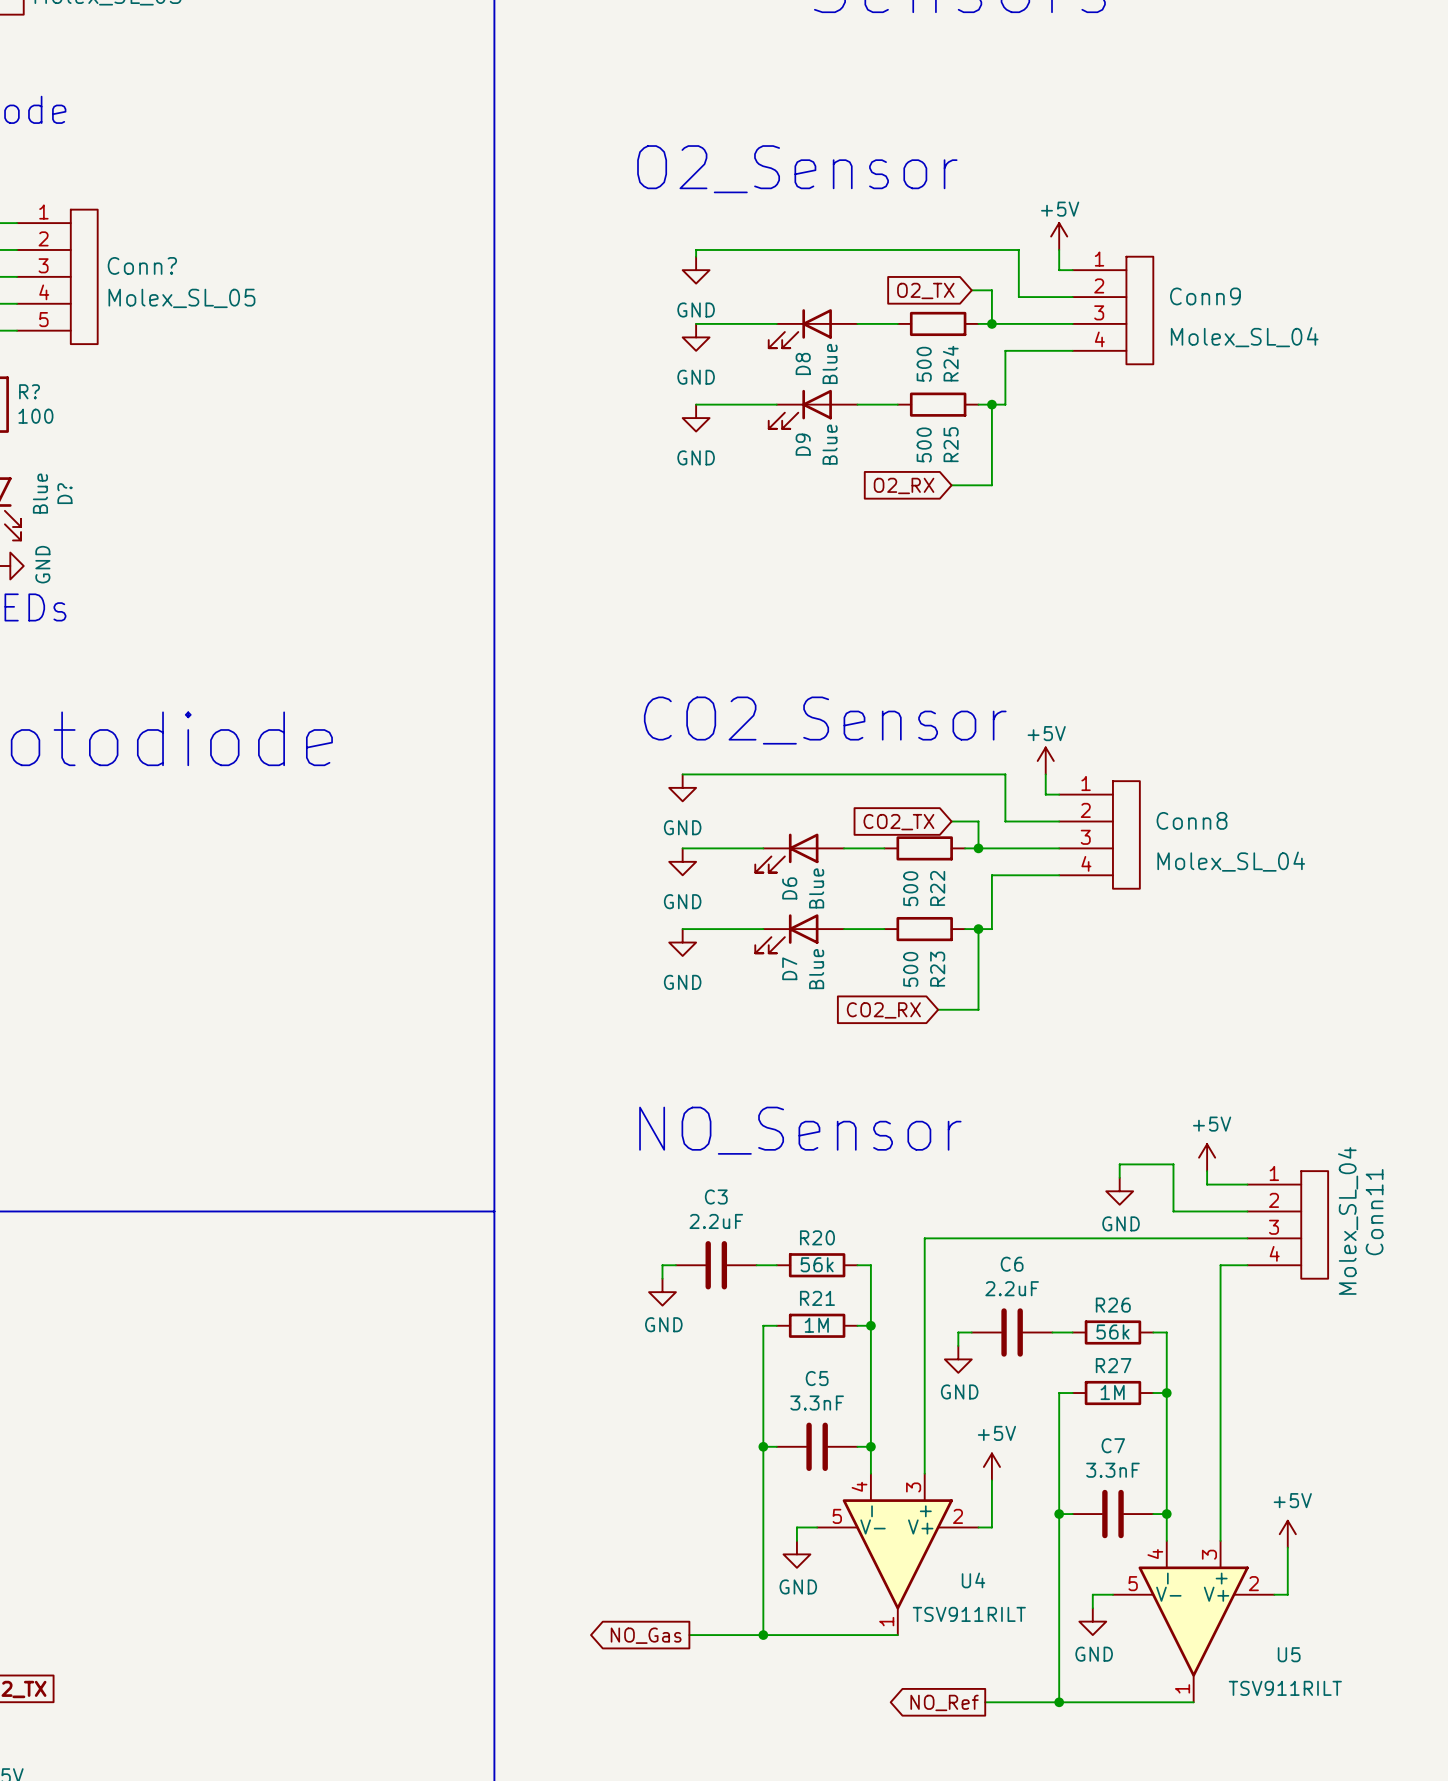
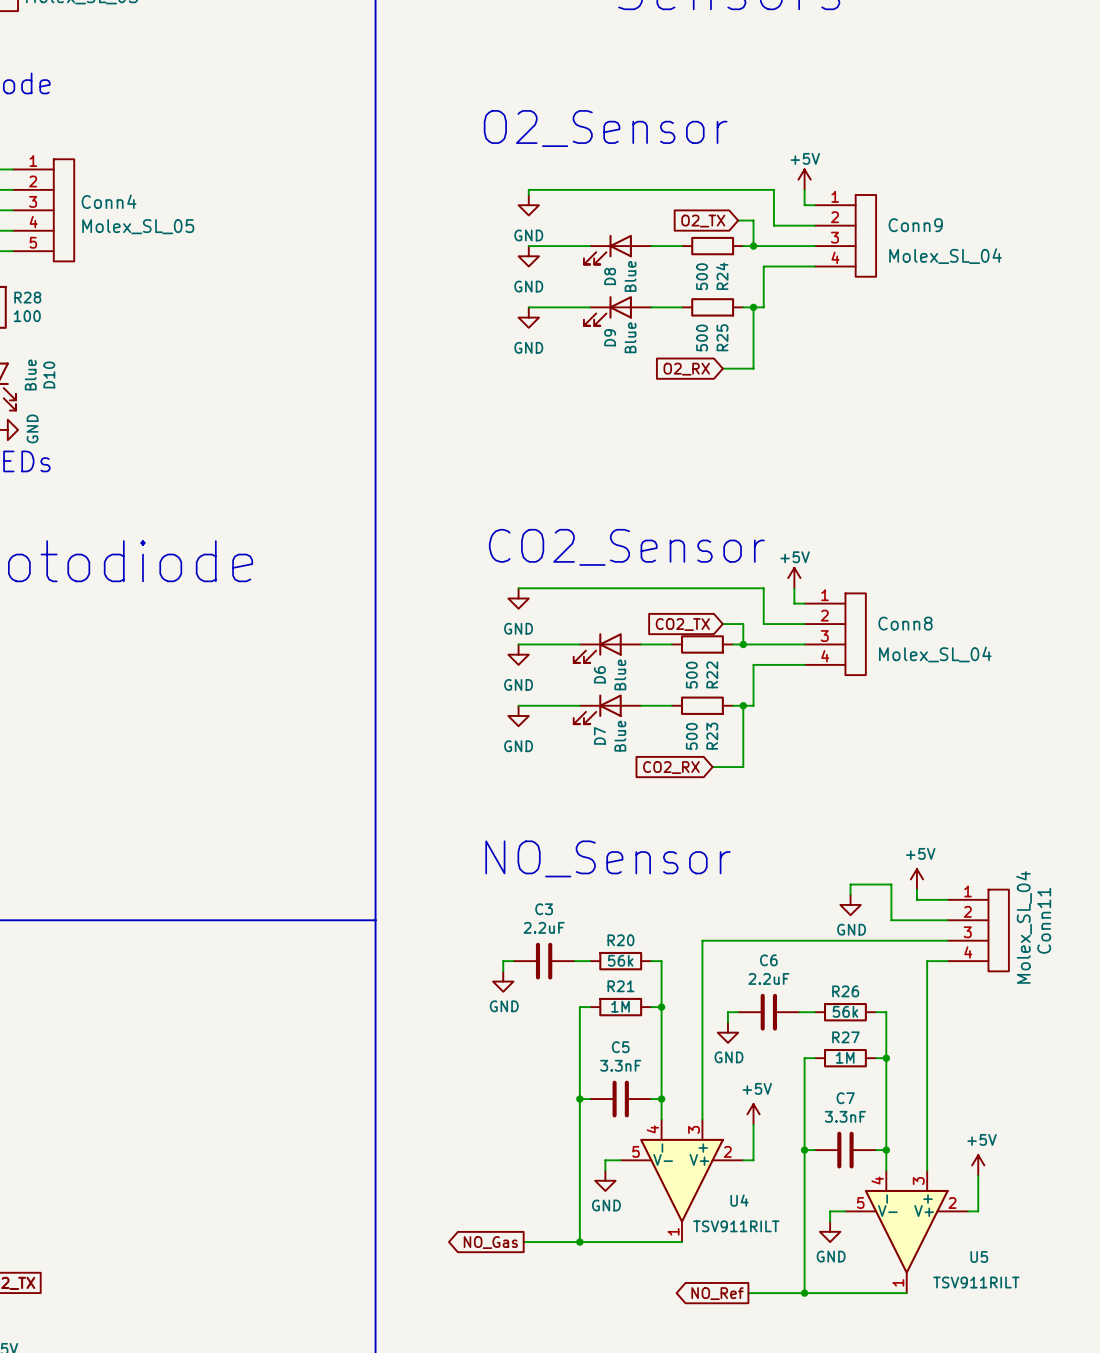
Conn? name: Conn? (142, 265) -> Conn4 (109, 201)
R? name: R? (29, 391) -> R28 (27, 297)
D? name: D? (64, 493) -> D10 (49, 374)

